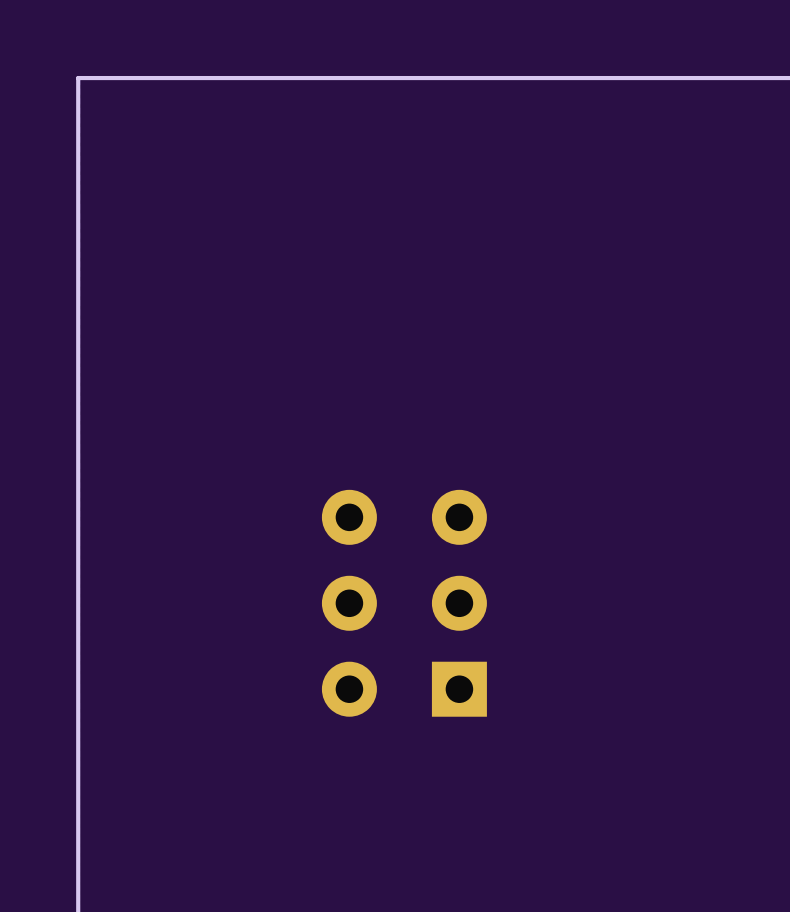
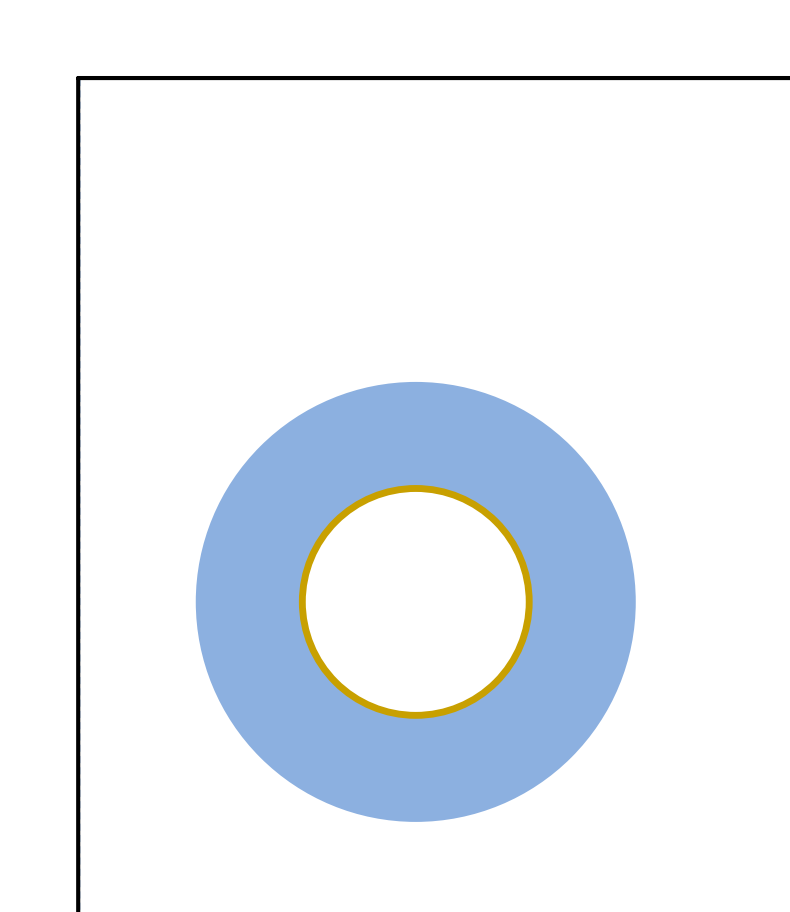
part footprint: [321, 489, 487, 717] -> [195, 381, 636, 822]

